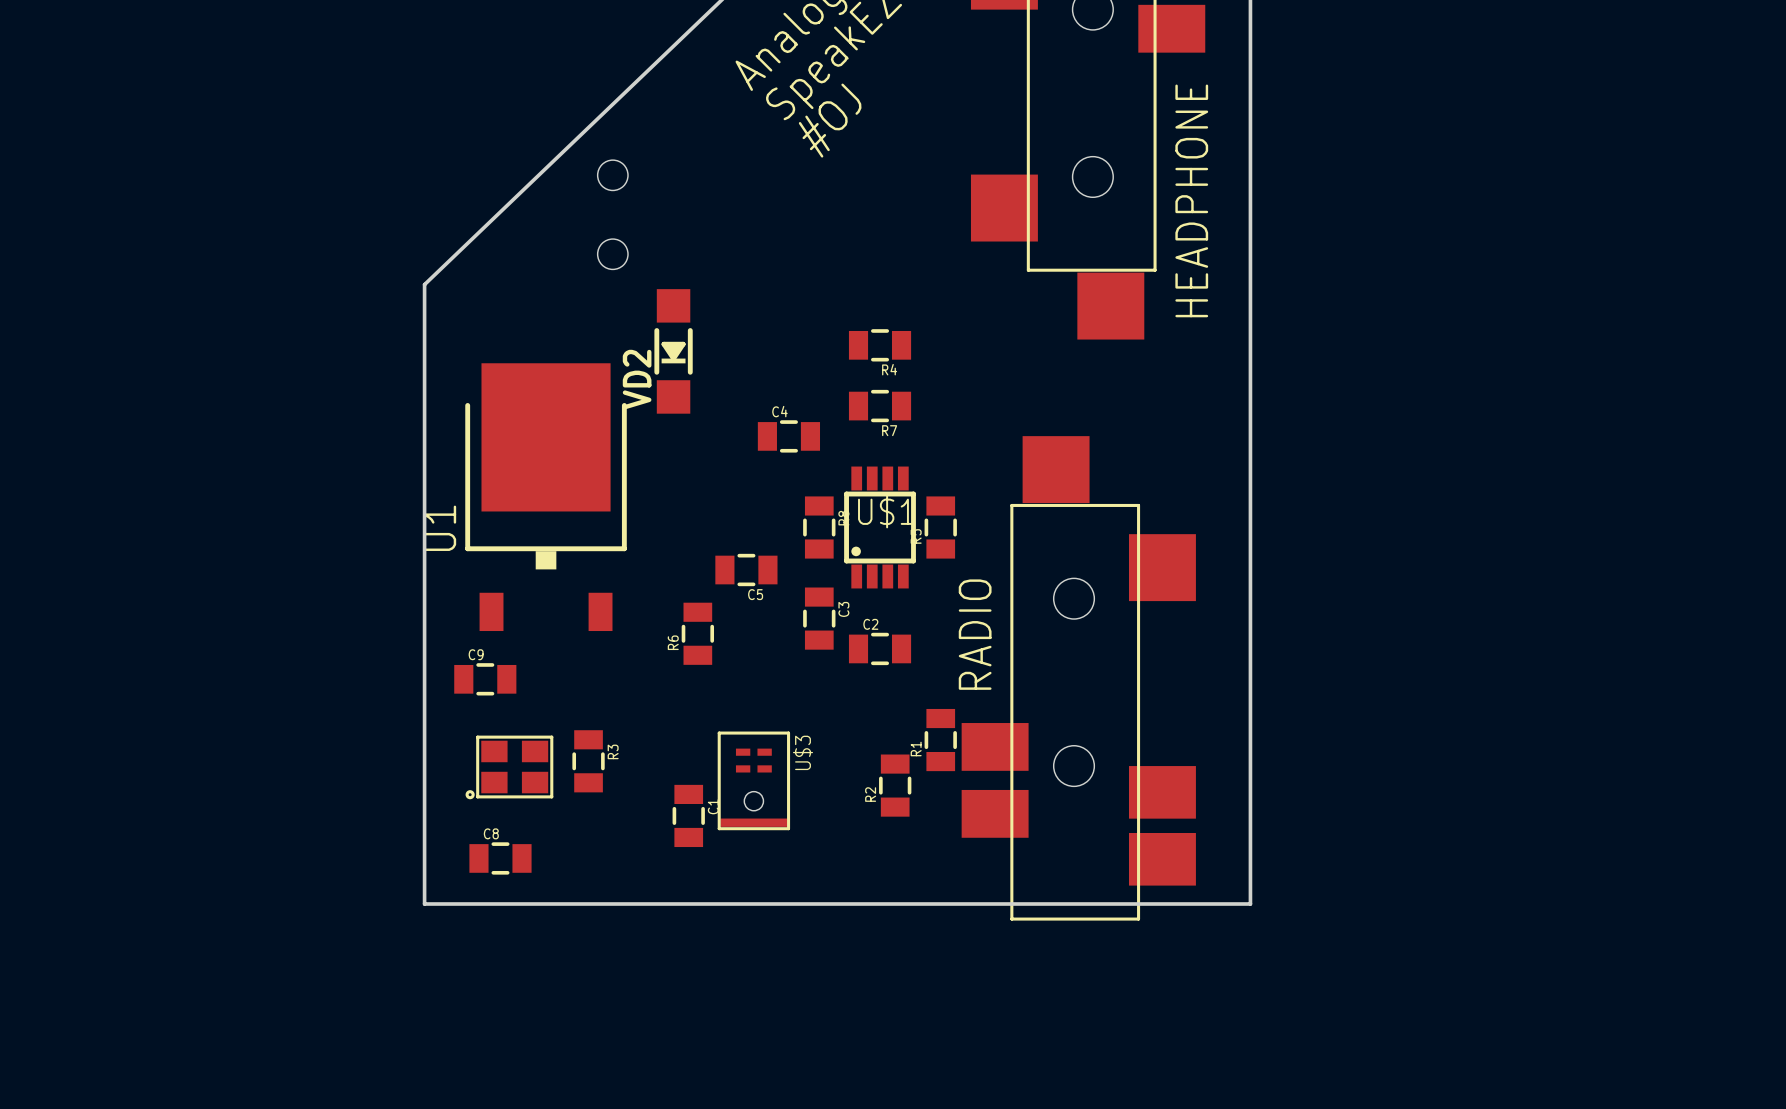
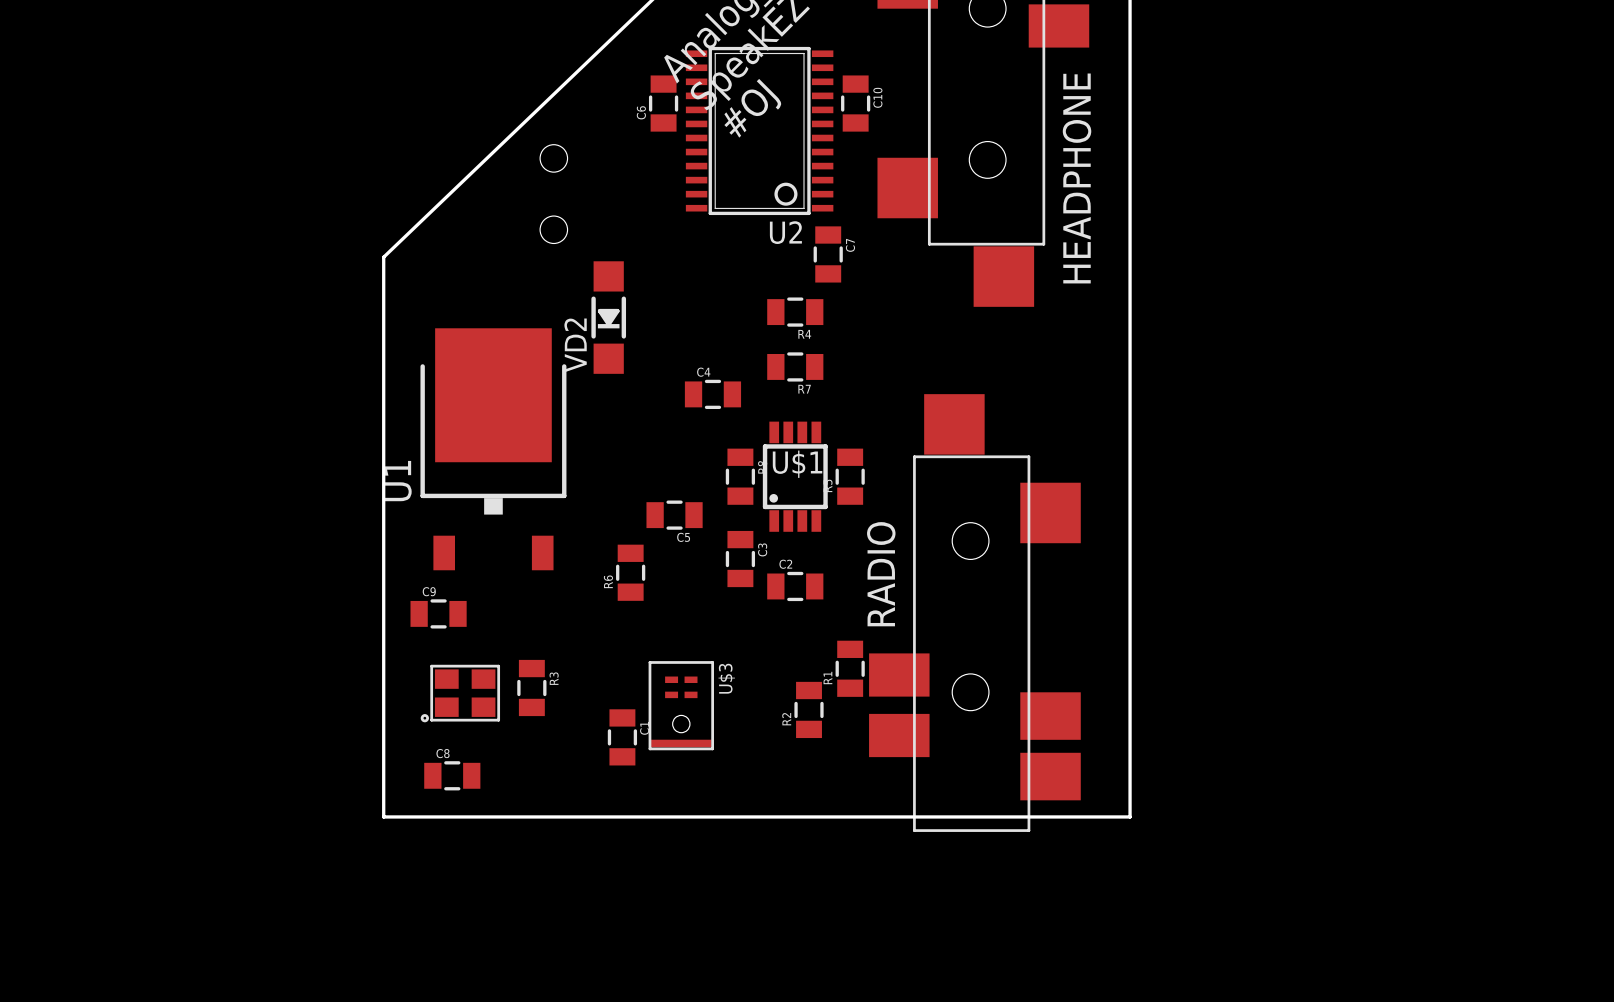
C6: none -> (663, 103)
C10: none -> (855, 103)
U2: none -> (759, 130)
C7: none -> (828, 254)

